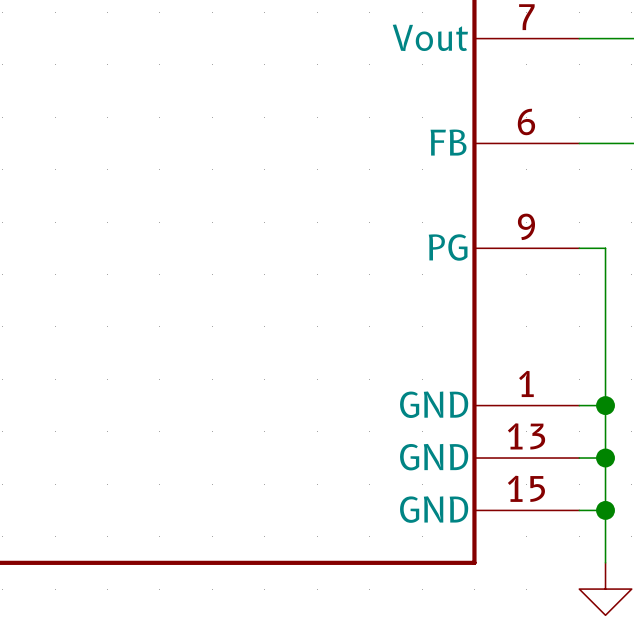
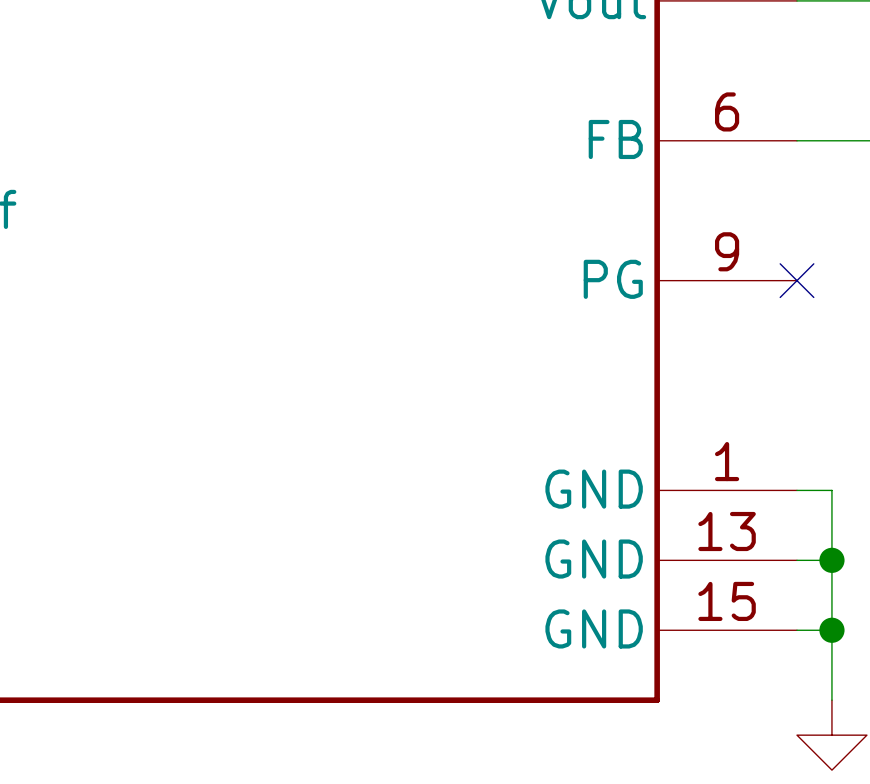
wire: (579, 248) (605, 248) (605, 405) -> none
no-connect mark: none -> (797, 280)
junction: (605, 405) -> none

